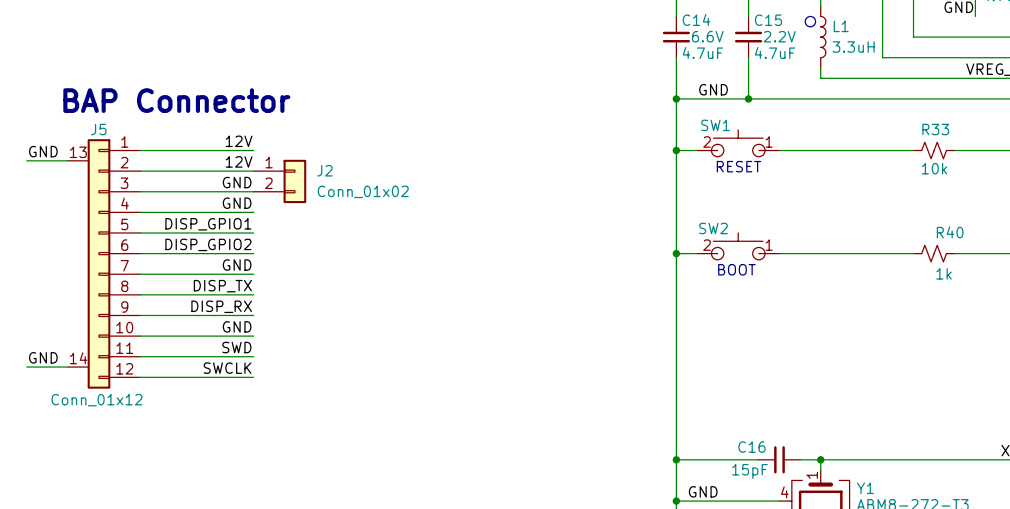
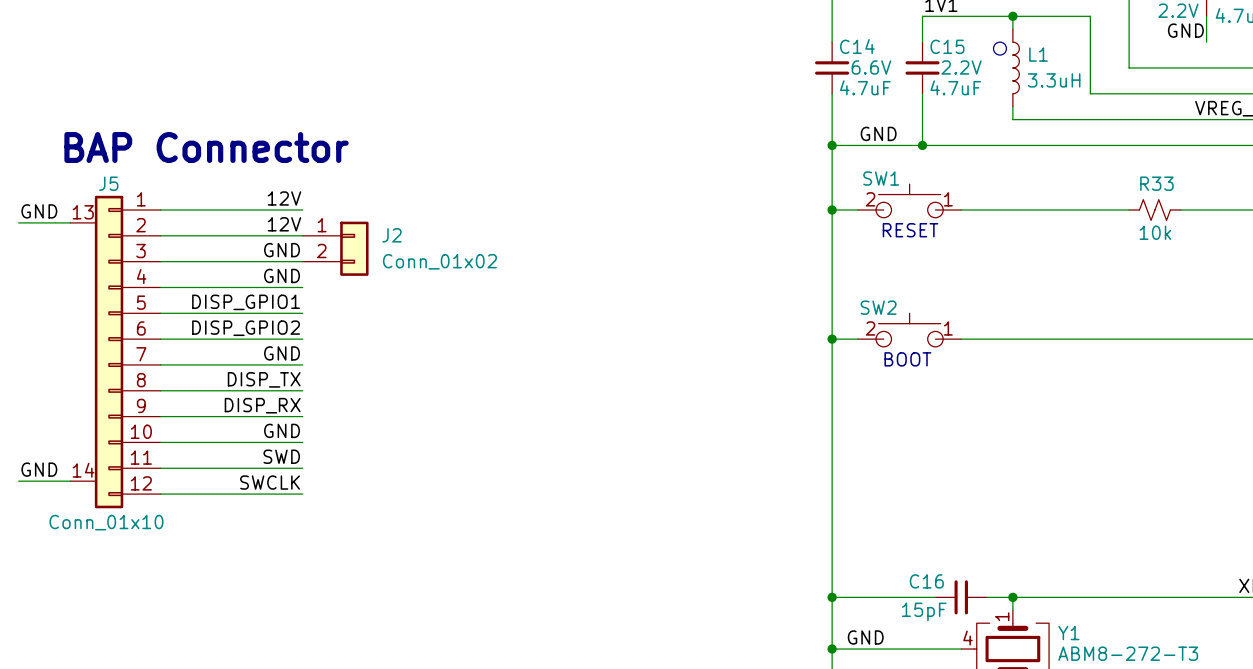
R40: 1k (934, 253) -> none
J5 value: Conn_01x12 (96, 400) -> Conn_01x10 (106, 522)

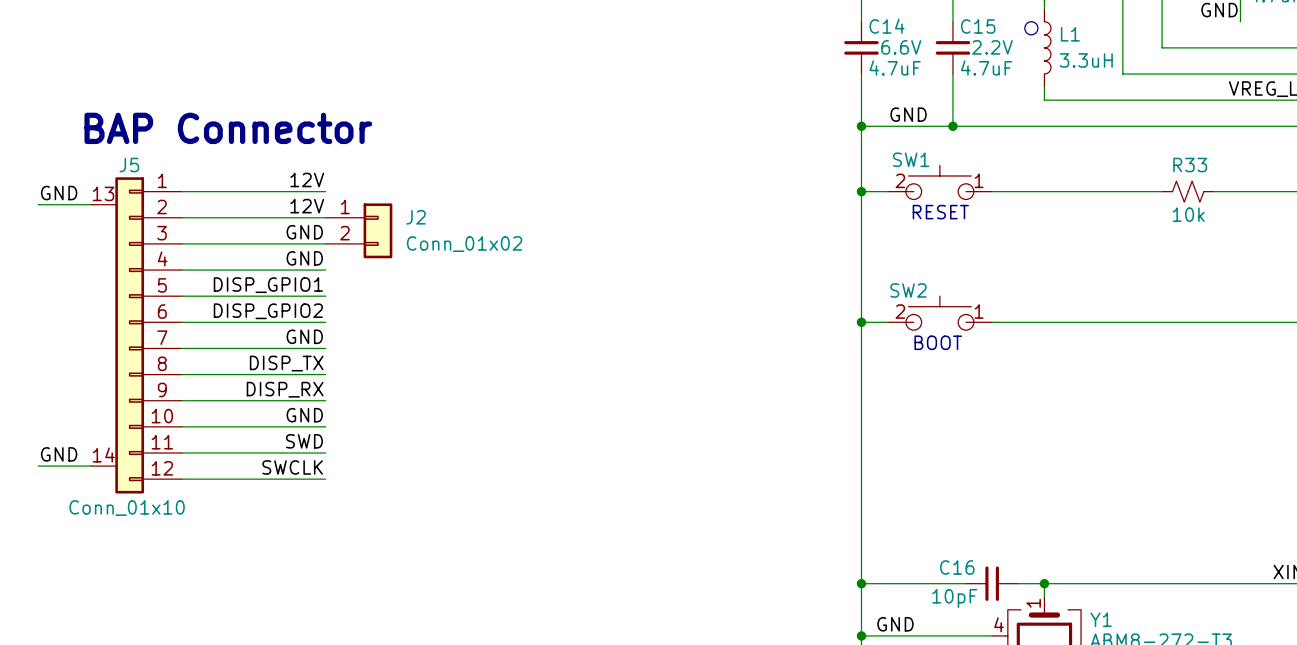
C16 value: 15pF (924, 611) -> 10pF (954, 598)

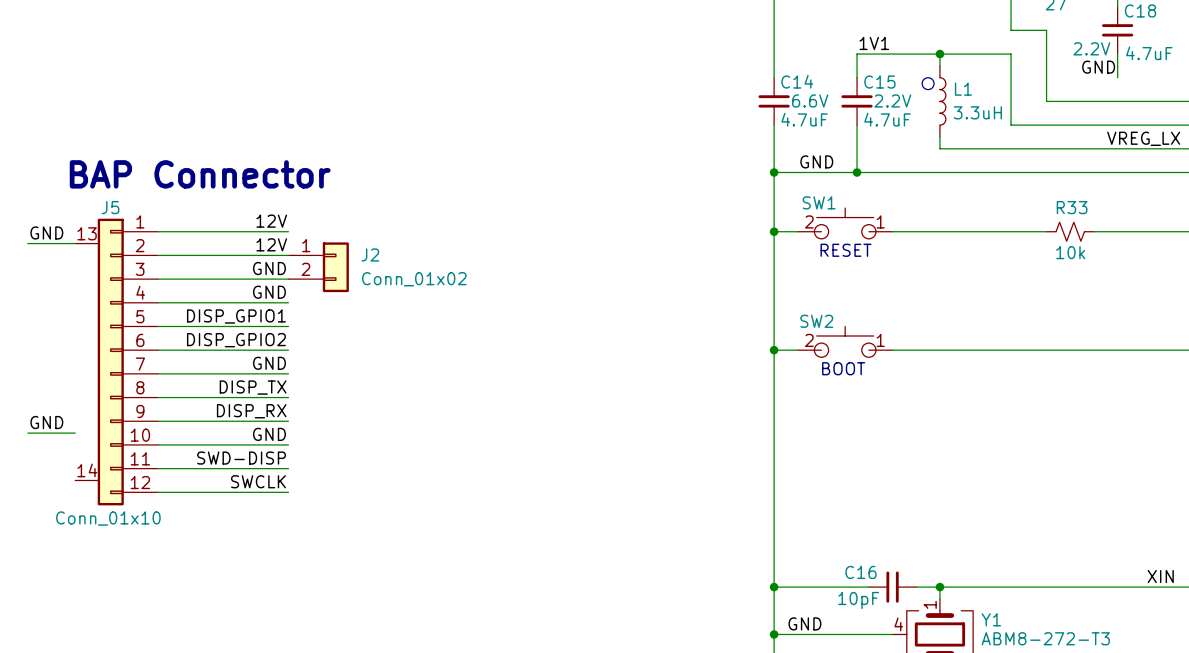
label: SWD (304, 441) -> SWD-DISP (241, 458)
label position: GND (59, 454) -> GND (46, 422)
wire: (38, 466) (90, 466) -> (27, 433) (75, 433)

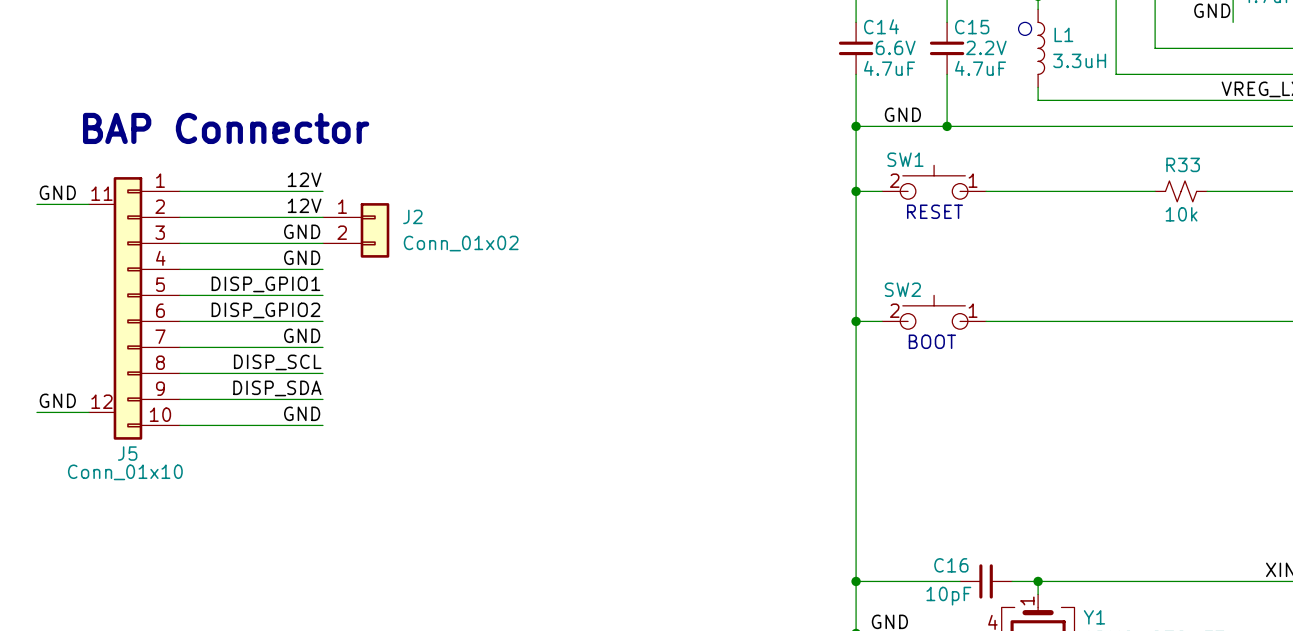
J5 name position: J5 (110, 207) -> J5 (127, 453)
J5 symbol: [75, 218, 159, 506] -> [88, 177, 180, 440]
label: DISP_TX (253, 387) -> DISP_SCL (277, 362)
label: DISP_RX (251, 411) -> DISP_SDA (277, 388)
label: SWD-DISP (241, 458) -> none
wire: (158, 468) (288, 468) -> none
label: SWCLK (258, 481) -> none
wire: (158, 492) (288, 492) -> none

